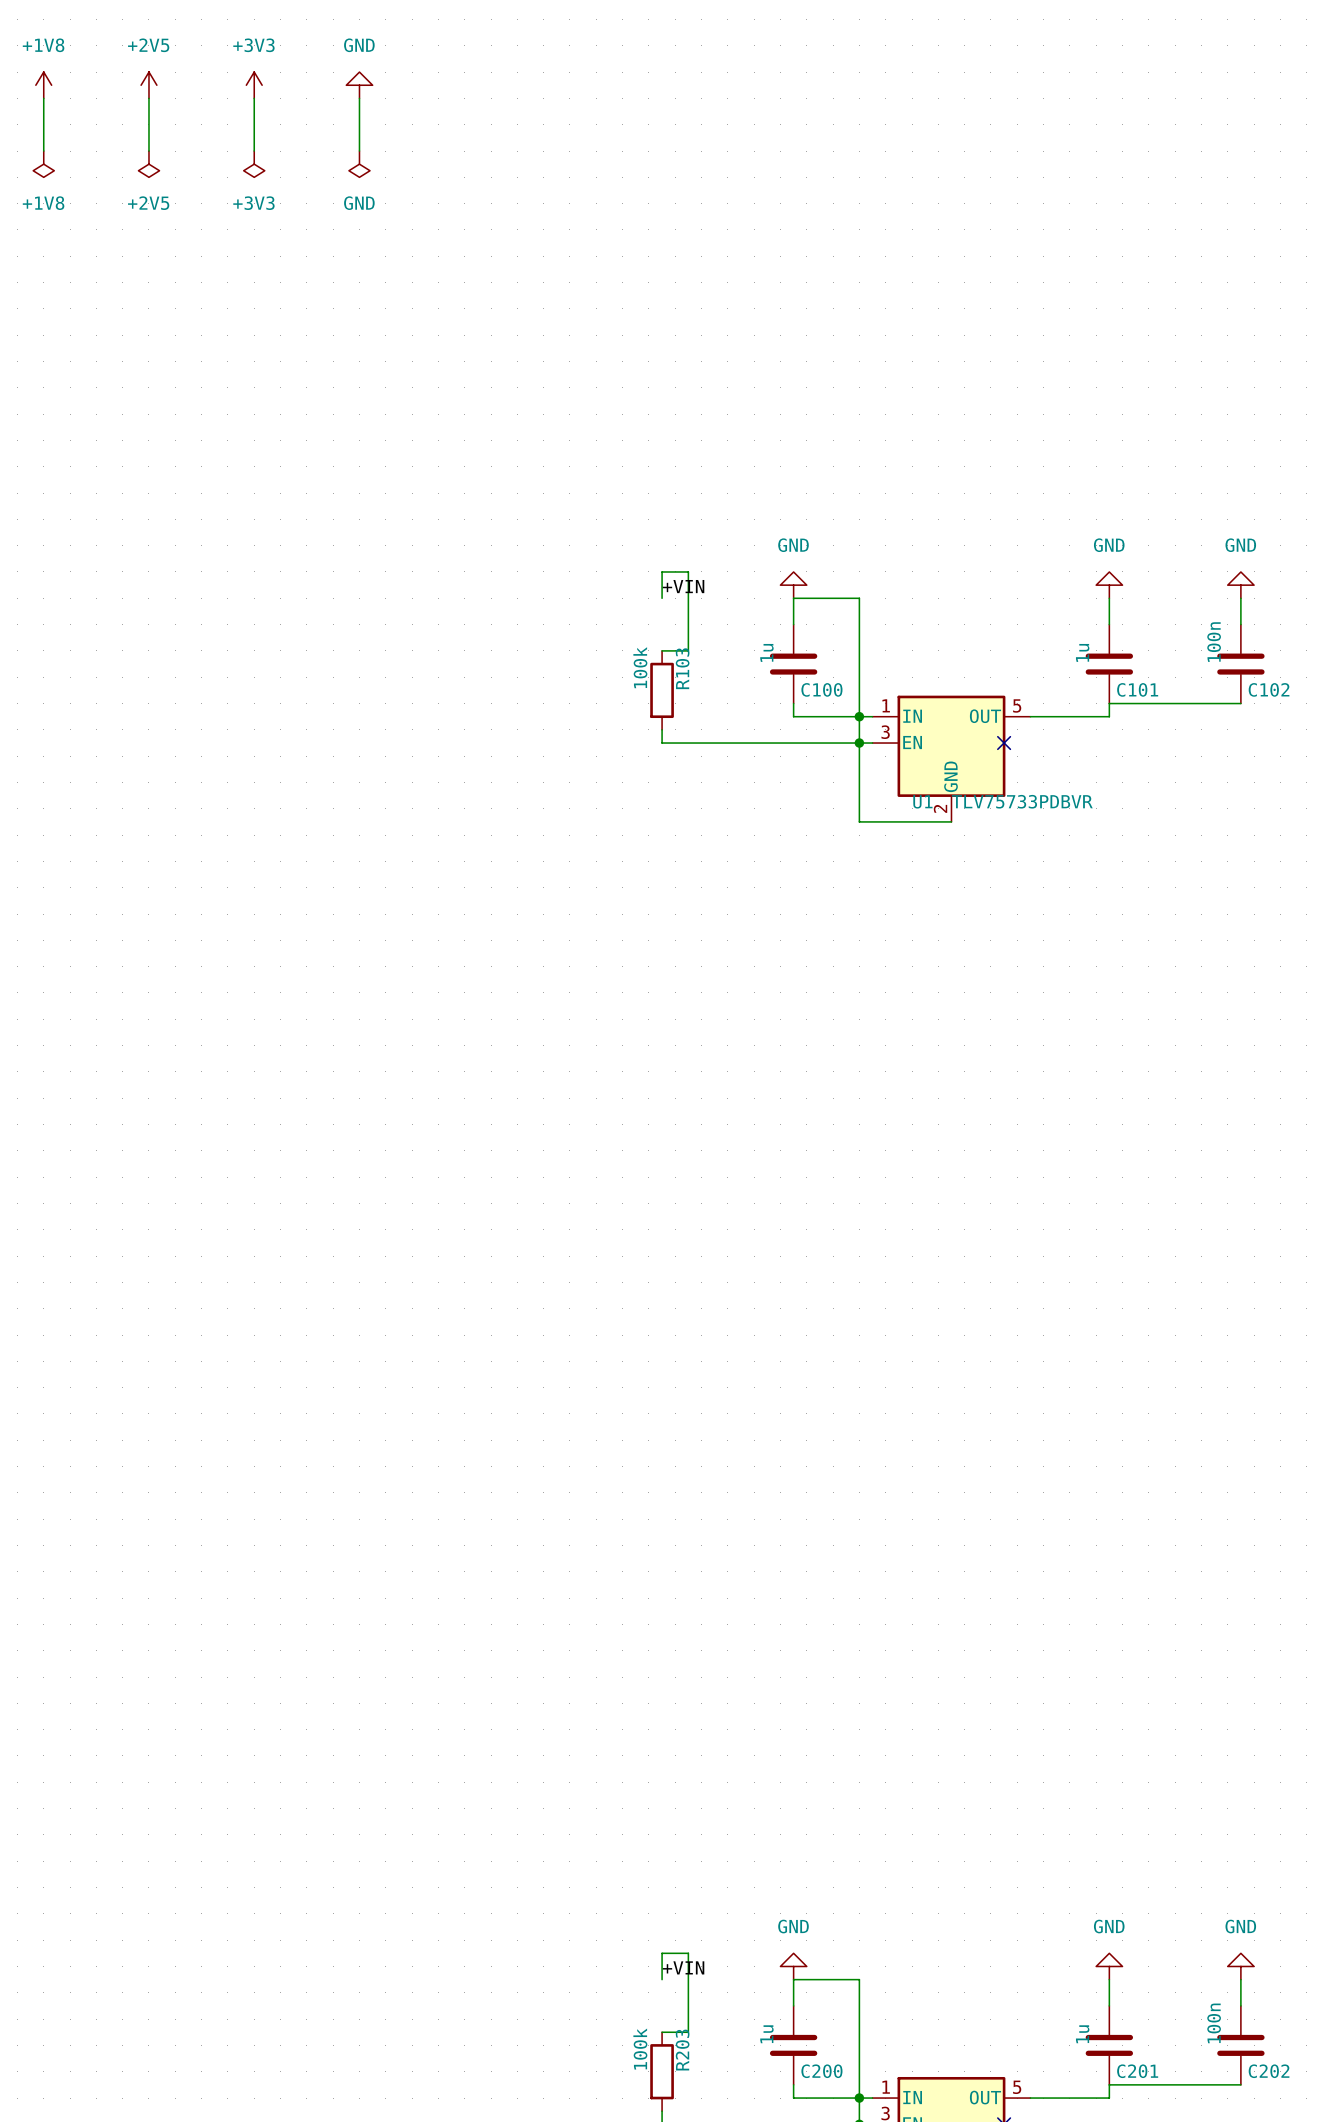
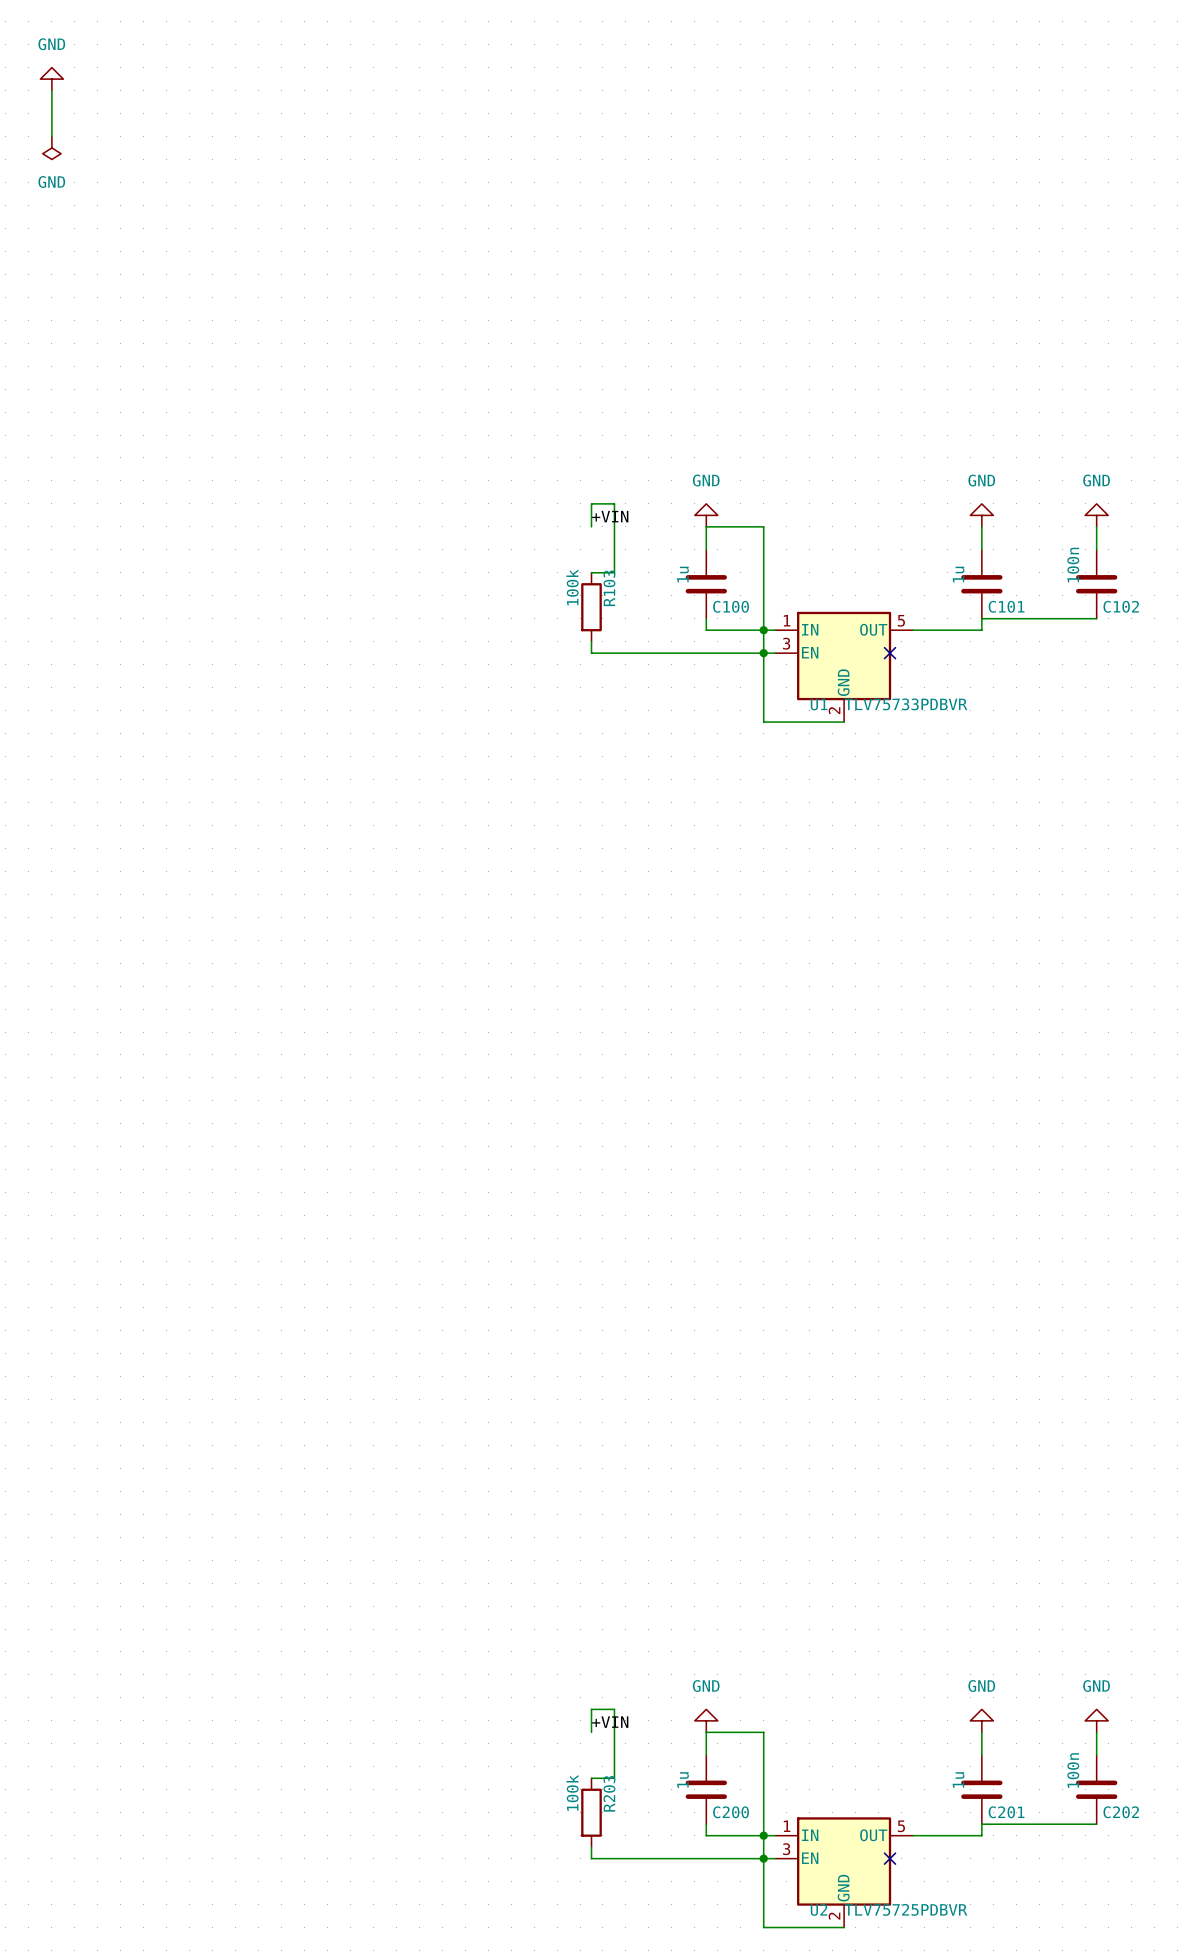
power symbol: +1V8 (43, 85) -> GND (51, 79)
power symbol: +2V5 (148, 85) -> none
power symbol: +3V3 (254, 85) -> none
power symbol: GND (359, 85) -> none
wire: (148, 98) (148, 151) -> none
wire: (254, 98) (254, 151) -> none
wire: (359, 98) (359, 151) -> none
power symbol: +1V8 (43, 164) -> GND (51, 147)
power symbol: +2V5 (148, 164) -> none
power symbol: +3V3 (254, 164) -> none
power symbol: GND (359, 164) -> none

